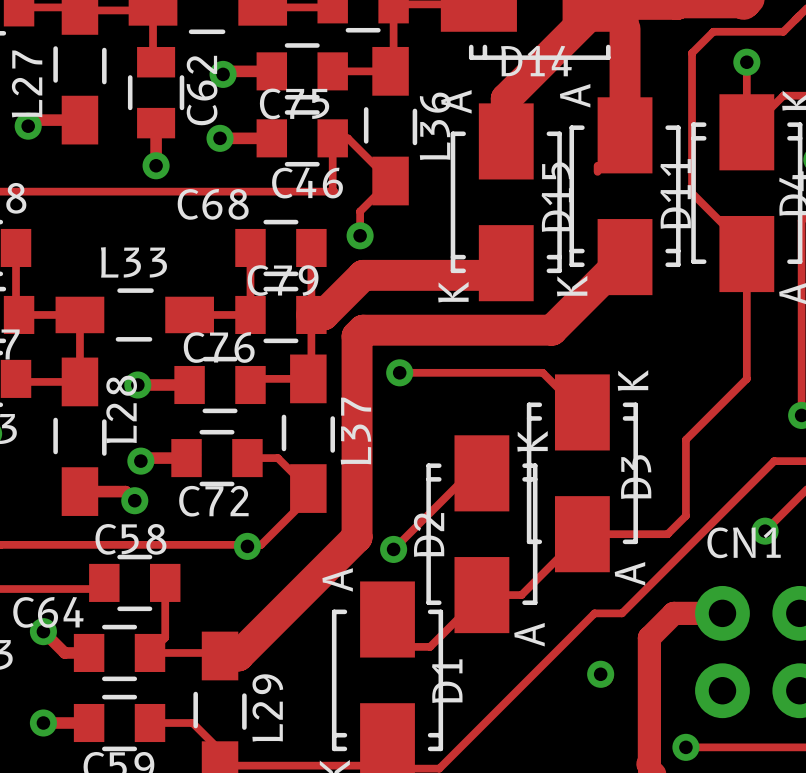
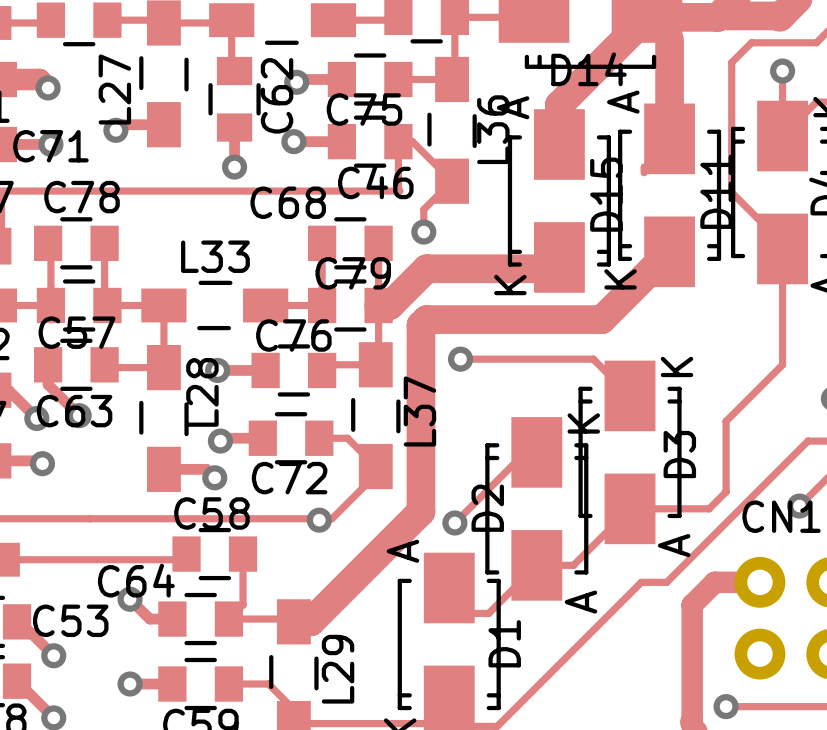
via: (600, 674) -> none

